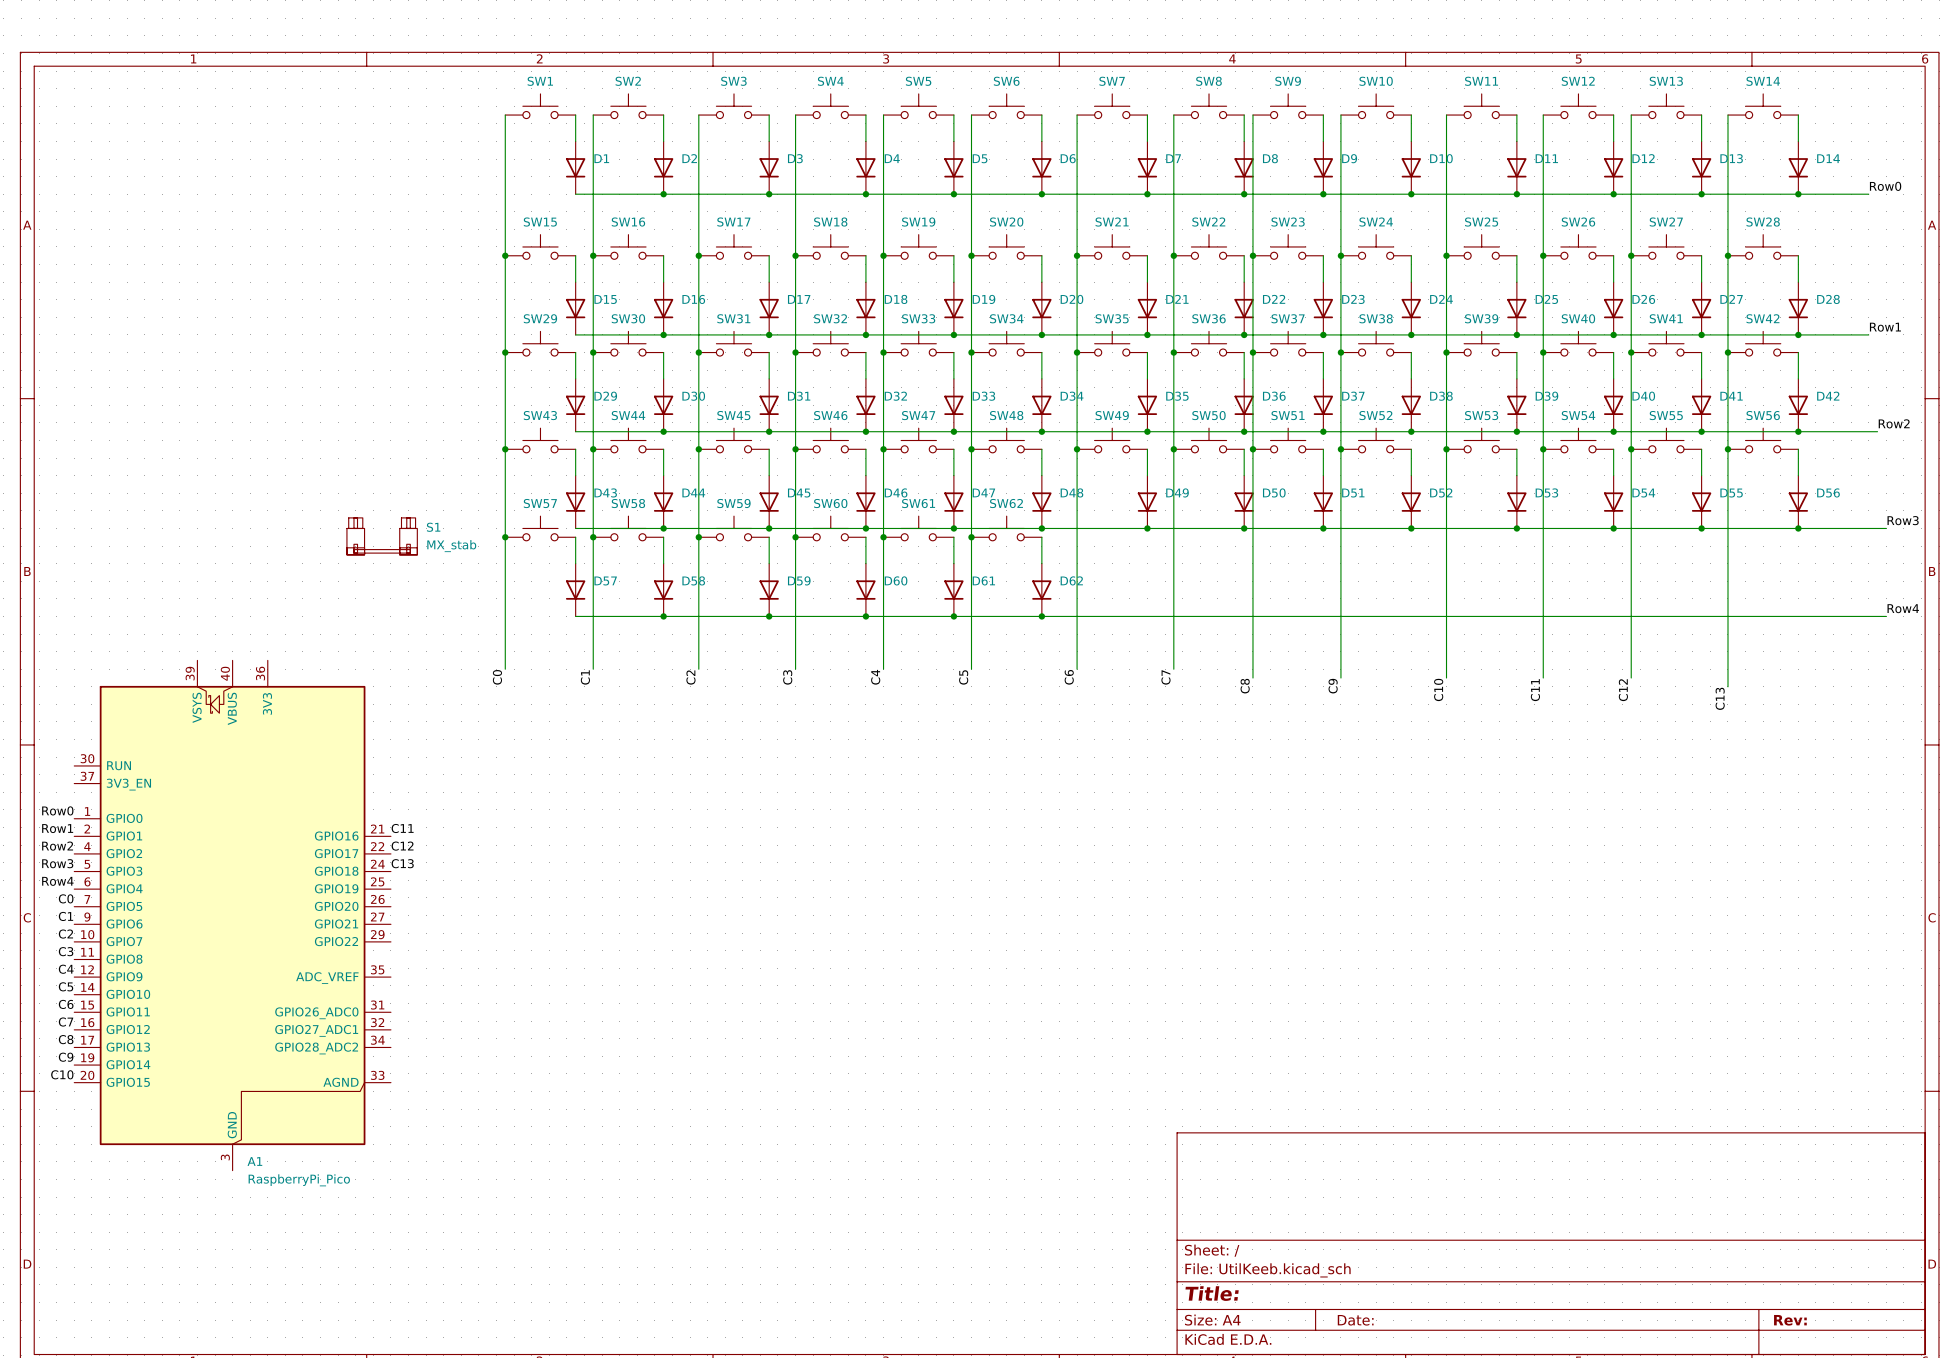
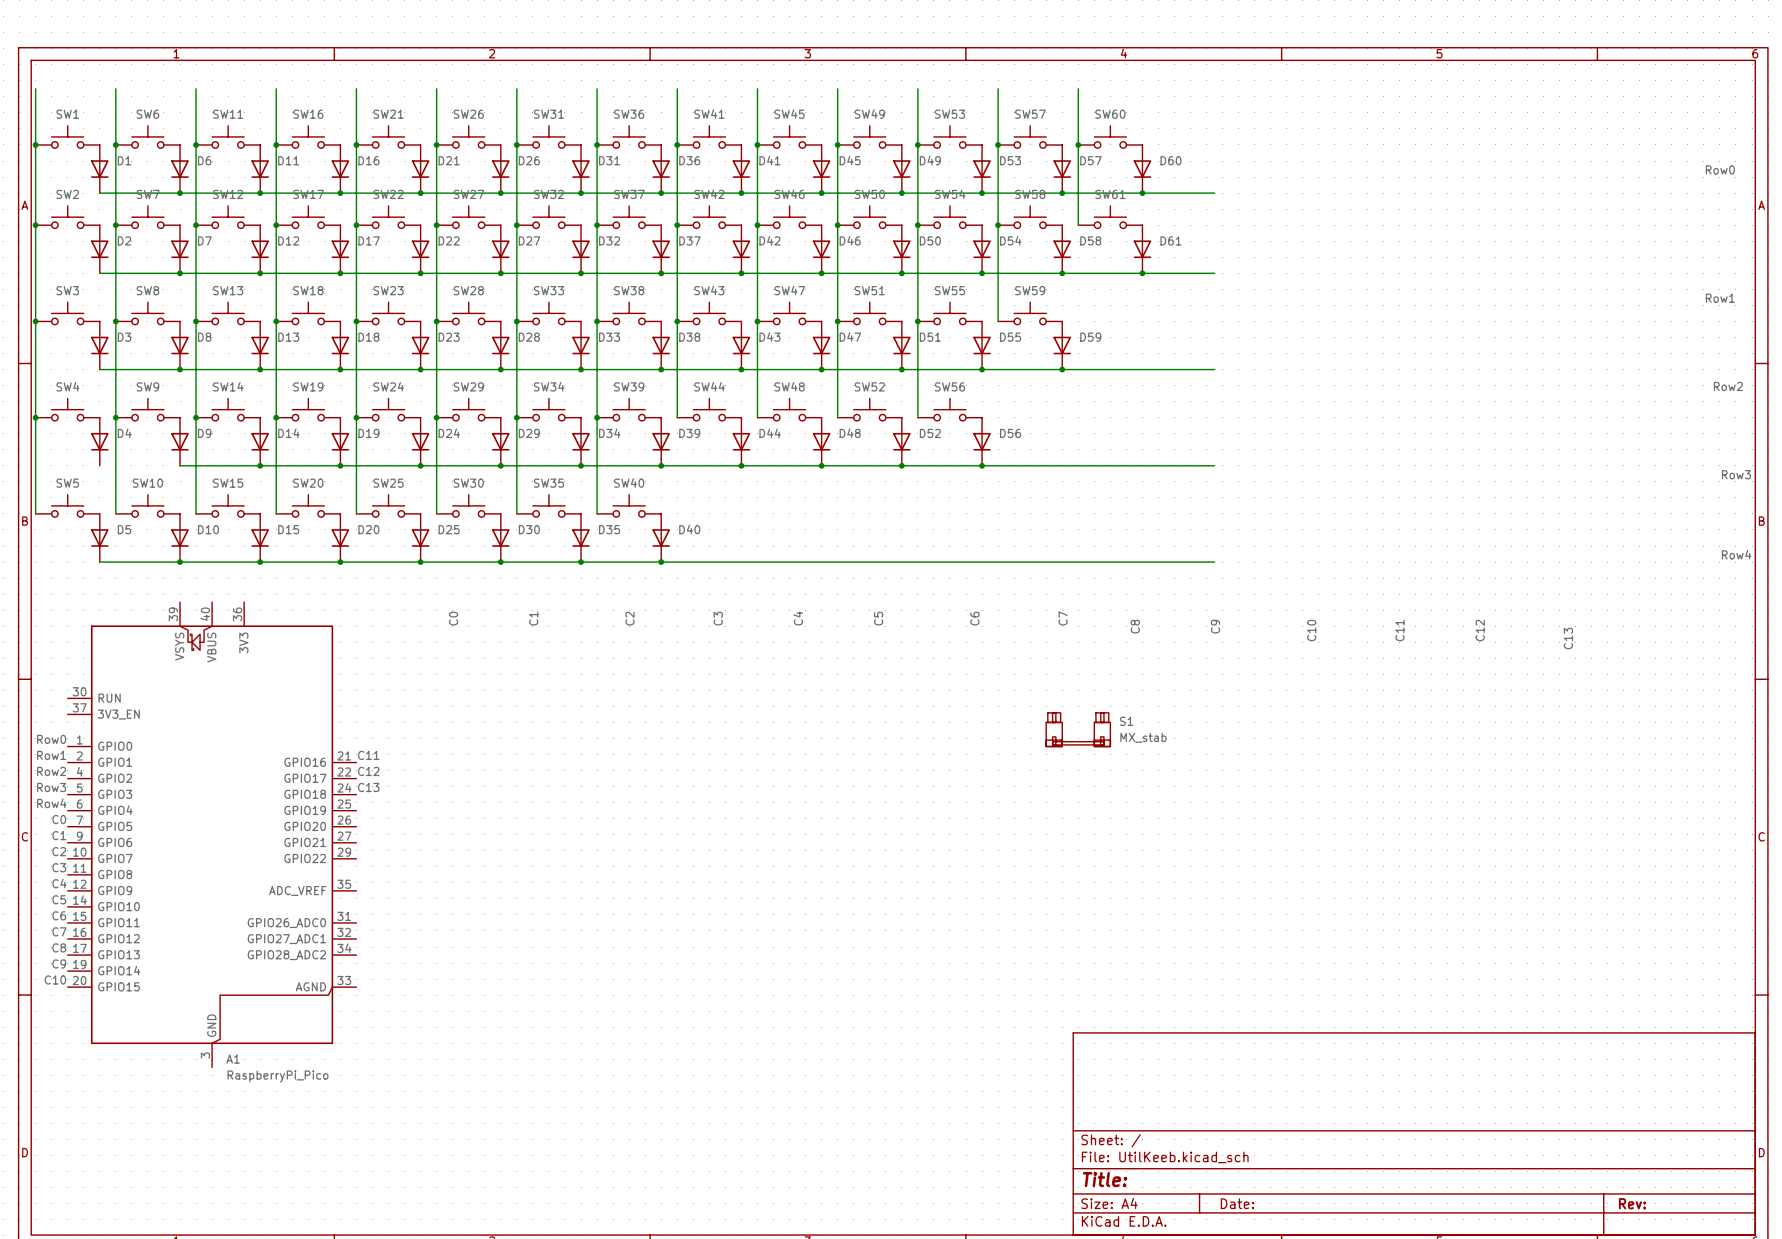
wire: none -> (35, 88) (35, 513)
wire: none -> (115, 88) (115, 513)
wire: none -> (196, 88) (196, 513)
wire: none -> (276, 88) (276, 513)
wire: none -> (356, 88) (356, 513)
wire: none -> (436, 88) (436, 513)
wire: none -> (516, 88) (516, 513)
wire: none -> (597, 88) (597, 513)
wire: none -> (677, 88) (677, 417)
wire: none -> (757, 88) (757, 417)
wire: none -> (837, 88) (837, 417)
wire: none -> (917, 88) (917, 417)
wire: none -> (998, 88) (998, 321)
wire: none -> (1078, 88) (1078, 225)
SW1 position: (540, 106) -> (67, 136)
SW2 position: (628, 106) -> (67, 217)
SW3 position: (733, 106) -> (67, 313)
SW4 position: (830, 106) -> (67, 409)
SW5 position: (918, 106) -> (67, 505)
SW6 position: (1006, 106) -> (147, 136)
SW7 position: (1112, 106) -> (147, 217)
SW8 position: (1209, 106) -> (147, 313)
SW9 position: (1288, 106) -> (147, 409)
SW10 position: (1376, 106) -> (147, 505)
SW11 position: (1481, 106) -> (228, 136)
SW12 position: (1578, 106) -> (228, 217)
SW13 position: (1666, 106) -> (228, 313)
SW14 position: (1763, 106) -> (228, 409)
wire: (505, 115) (505, 669) -> none
wire: (575, 115) (575, 141) -> none
wire: (593, 115) (593, 669) -> none
wire: (663, 115) (663, 141) -> none
wire: (698, 115) (698, 669) -> none
wire: (769, 115) (769, 141) -> none
wire: (795, 115) (795, 669) -> none
wire: (865, 115) (865, 141) -> none
wire: (883, 115) (883, 669) -> none
wire: (953, 115) (953, 141) -> none
wire: (971, 115) (971, 669) -> none
wire: (1041, 115) (1041, 141) -> none
wire: (1077, 115) (1077, 669) -> none
wire: (1147, 115) (1147, 141) -> none
wire: (1173, 115) (1173, 669) -> none
wire: (1244, 115) (1244, 141) -> none
wire: (1252, 115) (1252, 678) -> none
wire: (1323, 115) (1323, 141) -> none
wire: (1340, 115) (1340, 678) -> none
wire: (1411, 115) (1411, 141) -> none
wire: (1446, 115) (1446, 678) -> none
wire: (1516, 115) (1516, 141) -> none
wire: (1543, 115) (1543, 678) -> none
wire: (1613, 115) (1613, 141) -> none
wire: (1631, 115) (1631, 678) -> none
wire: (1701, 115) (1701, 141) -> none
wire: (1727, 115) (1727, 686) -> none
wire: (1798, 115) (1798, 141) -> none
junction: none -> (35, 144)
junction: none -> (115, 144)
junction: none -> (196, 144)
junction: none -> (276, 144)
junction: none -> (356, 144)
junction: none -> (436, 144)
junction: none -> (516, 144)
junction: none -> (597, 144)
junction: none -> (677, 144)
junction: none -> (757, 144)
junction: none -> (837, 144)
junction: none -> (917, 144)
junction: none -> (998, 144)
junction: none -> (1078, 144)
D1 position: (575, 167) -> (99, 169)
D2 position: (663, 167) -> (99, 249)
D3 position: (769, 167) -> (99, 345)
D4 position: (865, 167) -> (99, 441)
D5 position: (953, 167) -> (99, 537)
D6 position: (1041, 167) -> (180, 169)
D7 position: (1147, 167) -> (180, 249)
D8 position: (1244, 167) -> (180, 345)
D9 position: (1323, 167) -> (180, 441)
D10 position: (1411, 167) -> (180, 537)
D11 position: (1516, 167) -> (260, 169)
D12 position: (1613, 167) -> (260, 249)
D13 position: (1701, 167) -> (260, 345)
D14 position: (1798, 167) -> (260, 441)
wire: (575, 194) (1868, 194) -> none
junction: (663, 194) -> none
junction: (769, 194) -> none
junction: (865, 194) -> none
junction: (953, 194) -> none
junction: (1041, 194) -> none
junction: (1147, 194) -> none
junction position: (1244, 194) -> (1142, 193)
junction: (1323, 194) -> none
junction: (1411, 194) -> none
junction: (1516, 194) -> none
junction: (1613, 194) -> none
junction: (1701, 194) -> none
junction: (1798, 194) -> none
wire: none -> (99, 193) (1214, 193)
junction: none -> (180, 193)
junction: none -> (260, 193)
junction: none -> (340, 193)
junction: none -> (420, 193)
junction: none -> (500, 193)
junction: none -> (581, 193)
junction: none -> (661, 193)
junction: none -> (741, 193)
junction: none -> (821, 193)
junction: none -> (901, 193)
junction: none -> (982, 193)
junction: none -> (1062, 193)
junction: none -> (35, 225)
junction: none -> (115, 225)
junction: none -> (196, 225)
junction: none -> (276, 225)
junction: none -> (356, 225)
SW15 position: (540, 246) -> (228, 505)
SW16 position: (628, 246) -> (308, 136)
junction: none -> (597, 225)
SW17 position: (733, 246) -> (308, 217)
junction: none -> (677, 225)
junction: none -> (757, 225)
SW18 position: (830, 246) -> (308, 313)
junction: none -> (837, 225)
SW19 position: (918, 246) -> (308, 409)
junction: none -> (917, 225)
SW20 position: (1006, 246) -> (308, 505)
SW21 position: (1112, 246) -> (388, 136)
SW22 position: (1209, 246) -> (388, 217)
SW23 position: (1288, 246) -> (388, 313)
SW24 position: (1376, 246) -> (388, 409)
SW25 position: (1481, 246) -> (388, 505)
SW26 position: (1578, 246) -> (468, 136)
SW27 position: (1666, 246) -> (468, 217)
SW28 position: (1763, 246) -> (468, 313)
junction position: (505, 255) -> (436, 225)
wire: (575, 255) (575, 282) -> none
junction position: (593, 255) -> (516, 225)
wire: (663, 255) (663, 282) -> none
junction: (698, 255) -> none
wire: (769, 255) (769, 282) -> none
junction: (795, 255) -> none
wire: (865, 255) (865, 282) -> none
junction: (883, 255) -> none
wire: (953, 255) (953, 282) -> none
junction: (971, 255) -> none
wire: (1041, 255) (1041, 282) -> none
junction position: (1077, 255) -> (998, 225)
wire: (1147, 255) (1147, 282) -> none
junction: (1173, 255) -> none
wire: (1244, 255) (1244, 282) -> none
junction: (1252, 255) -> none
wire: (1323, 255) (1323, 282) -> none
junction: (1340, 255) -> none
wire: (1411, 255) (1411, 282) -> none
junction: (1446, 255) -> none
wire: (1516, 255) (1516, 282) -> none
junction: (1543, 255) -> none
wire: (1613, 255) (1613, 282) -> none
junction: (1631, 255) -> none
wire: (1701, 255) (1701, 282) -> none
junction: (1727, 255) -> none
wire: (1798, 255) (1798, 282) -> none
wire: none -> (99, 273) (1214, 273)
junction: none -> (180, 273)
junction: none -> (260, 273)
junction: none -> (340, 273)
junction: none -> (420, 273)
junction: none -> (500, 273)
junction: none -> (581, 273)
junction: none -> (661, 273)
junction: none -> (741, 273)
junction: none -> (821, 273)
junction: none -> (901, 273)
junction: none -> (982, 273)
junction: none -> (1062, 273)
junction: none -> (1142, 273)
D15 position: (575, 308) -> (260, 537)
D16 position: (663, 308) -> (340, 169)
D17 position: (769, 308) -> (340, 249)
D18 position: (865, 308) -> (340, 345)
D19 position: (953, 308) -> (340, 441)
D20 position: (1041, 308) -> (340, 537)
D21 position: (1147, 308) -> (420, 169)
D22 position: (1244, 308) -> (420, 249)
D23 position: (1323, 308) -> (420, 345)
D24 position: (1411, 308) -> (420, 441)
D25 position: (1516, 308) -> (420, 537)
D26 position: (1613, 308) -> (500, 169)
D27 position: (1701, 308) -> (500, 249)
D28 position: (1798, 308) -> (500, 345)
wire: (575, 334) (1868, 334) -> none
junction position: (663, 334) -> (597, 321)
junction: (769, 334) -> none
junction: (865, 334) -> none
junction: (953, 334) -> none
junction: (1041, 334) -> none
junction: (1147, 334) -> none
junction: (1244, 334) -> none
junction: (1323, 334) -> none
junction: (1411, 334) -> none
junction: (1516, 334) -> none
junction: (1613, 334) -> none
junction: (1701, 334) -> none
junction: (1798, 334) -> none
SW29 position: (540, 343) -> (468, 409)
SW30 position: (628, 343) -> (468, 505)
SW31 position: (733, 343) -> (548, 136)
SW32 position: (830, 343) -> (548, 217)
SW33 position: (918, 343) -> (548, 313)
SW34 position: (1006, 343) -> (548, 409)
SW35 position: (1112, 343) -> (548, 505)
SW36 position: (1209, 343) -> (629, 136)
SW37 position: (1288, 343) -> (629, 217)
SW38 position: (1376, 343) -> (629, 313)
SW39 position: (1481, 343) -> (629, 409)
SW40 position: (1578, 343) -> (629, 505)
SW41 position: (1666, 343) -> (709, 136)
SW42 position: (1763, 343) -> (709, 217)
junction: none -> (35, 321)
junction: none -> (115, 321)
junction: none -> (196, 321)
junction: none -> (276, 321)
junction: none -> (356, 321)
junction position: (505, 352) -> (436, 321)
wire: (575, 352) (575, 378) -> none
junction position: (593, 352) -> (516, 321)
wire: (663, 352) (663, 378) -> none
junction: (698, 352) -> none
junction: none -> (677, 321)
wire: (769, 352) (769, 378) -> none
junction: (795, 352) -> none
junction: none -> (757, 321)
wire: (865, 352) (865, 378) -> none
junction: (883, 352) -> none
junction: none -> (837, 321)
wire: (953, 352) (953, 378) -> none
junction: (971, 352) -> none
junction: none -> (917, 321)
wire: (1041, 352) (1041, 378) -> none
junction: (1077, 352) -> none
wire: (1147, 352) (1147, 378) -> none
junction: (1173, 352) -> none
wire: (1244, 352) (1244, 378) -> none
junction: (1252, 352) -> none
wire: (1323, 352) (1323, 378) -> none
junction: (1340, 352) -> none
wire: (1411, 352) (1411, 378) -> none
junction: (1446, 352) -> none
wire: (1516, 352) (1516, 378) -> none
junction: (1543, 352) -> none
wire: (1613, 352) (1613, 378) -> none
junction: (1631, 352) -> none
wire: (1701, 352) (1701, 378) -> none
junction: (1727, 352) -> none
wire: (1798, 352) (1798, 378) -> none
wire: none -> (99, 369) (1214, 369)
junction: none -> (180, 369)
junction: none -> (260, 369)
junction: none -> (340, 369)
junction: none -> (420, 369)
junction: none -> (500, 369)
D29 position: (575, 405) -> (500, 441)
junction: none -> (581, 369)
D30 position: (663, 405) -> (500, 537)
junction: none -> (661, 369)
D31 position: (769, 405) -> (581, 169)
junction: none -> (741, 369)
D32 position: (865, 405) -> (581, 249)
junction: none -> (821, 369)
D33 position: (953, 405) -> (581, 345)
junction: none -> (901, 369)
D34 position: (1041, 405) -> (581, 441)
junction: none -> (982, 369)
D35 position: (1147, 405) -> (581, 537)
junction: none -> (1062, 369)
D36 position: (1244, 405) -> (661, 169)
D37 position: (1323, 405) -> (661, 249)
D38 position: (1411, 405) -> (661, 345)
D39 position: (1516, 405) -> (661, 441)
D40 position: (1613, 405) -> (661, 537)
D41 position: (1701, 405) -> (741, 169)
D42 position: (1798, 405) -> (741, 249)
wire: (575, 431) (1877, 431) -> none
junction: (663, 431) -> none
junction: (769, 431) -> none
junction: (865, 431) -> none
junction: (953, 431) -> none
junction: (1041, 431) -> none
junction: (1147, 431) -> none
junction: (1244, 431) -> none
junction: (1323, 431) -> none
junction: (1411, 431) -> none
junction: (1516, 431) -> none
junction: (1613, 431) -> none
junction: (1701, 431) -> none
junction: (1798, 431) -> none
SW43 position: (540, 440) -> (709, 313)
SW44 position: (628, 440) -> (709, 409)
SW45 position: (733, 440) -> (789, 136)
SW46 position: (830, 440) -> (789, 217)
SW47 position: (918, 440) -> (789, 313)
SW48 position: (1006, 440) -> (789, 409)
SW49 position: (1112, 440) -> (869, 136)
SW50 position: (1209, 440) -> (869, 217)
SW51 position: (1288, 440) -> (869, 313)
SW52 position: (1376, 440) -> (869, 409)
SW53 position: (1481, 440) -> (949, 136)
SW54 position: (1578, 440) -> (949, 217)
SW55 position: (1666, 440) -> (949, 313)
SW56 position: (1763, 440) -> (949, 409)
junction position: (505, 449) -> (436, 417)
wire: (575, 449) (575, 475) -> none
junction position: (593, 449) -> (516, 417)
wire: (663, 449) (663, 475) -> none
junction: (698, 449) -> none
wire: (769, 449) (769, 475) -> none
junction: (795, 449) -> none
wire: (865, 449) (865, 475) -> none
junction: (883, 449) -> none
wire: (953, 449) (953, 475) -> none
junction: (971, 449) -> none
wire: (1041, 449) (1041, 475) -> none
junction: (1077, 449) -> none
wire: (1147, 449) (1147, 475) -> none
junction: (1173, 449) -> none
wire: (1244, 449) (1244, 475) -> none
junction: (1252, 449) -> none
wire: (1323, 449) (1323, 475) -> none
junction: (1340, 449) -> none
wire: (1411, 449) (1411, 475) -> none
junction: (1446, 449) -> none
wire: (1516, 449) (1516, 475) -> none
junction: (1543, 449) -> none
wire: (1613, 449) (1613, 475) -> none
junction: (1631, 449) -> none
wire: (1701, 449) (1701, 475) -> none
junction: (1727, 449) -> none
wire: (1798, 449) (1798, 475) -> none
junction: none -> (35, 417)
junction: none -> (115, 417)
junction: none -> (196, 417)
junction: none -> (276, 417)
junction: none -> (356, 417)
junction: none -> (597, 417)
D43 position: (575, 502) -> (741, 345)
D44 position: (663, 502) -> (741, 441)
D45 position: (769, 502) -> (821, 169)
D46 position: (865, 502) -> (821, 249)
D47 position: (953, 502) -> (821, 345)
D48 position: (1041, 502) -> (821, 441)
D49 position: (1147, 502) -> (901, 169)
D50 position: (1244, 502) -> (901, 249)
D51 position: (1323, 502) -> (901, 345)
D52 position: (1411, 502) -> (901, 441)
D53 position: (1516, 502) -> (982, 169)
D54 position: (1613, 502) -> (982, 249)
D55 position: (1701, 502) -> (982, 345)
D56 position: (1798, 502) -> (982, 441)
wire: none -> (180, 465) (1214, 465)
junction: none -> (260, 465)
junction: none -> (340, 465)
junction: none -> (420, 465)
junction: none -> (500, 465)
junction: none -> (581, 465)
junction: none -> (661, 465)
junction: none -> (741, 465)
junction: none -> (821, 465)
junction: none -> (901, 465)
junction: none -> (982, 465)
SW57 position: (540, 528) -> (1030, 136)
wire: (575, 528) (1886, 528) -> none
SW58 position: (628, 528) -> (1030, 217)
junction: (663, 528) -> none
SW59 position: (733, 528) -> (1030, 313)
junction: (769, 528) -> none
SW60 position: (830, 528) -> (1110, 136)
junction: (865, 528) -> none
SW61 position: (918, 528) -> (1110, 217)
junction: (953, 528) -> none
SW62: (1006, 528) -> none
junction: (1041, 528) -> none
junction: (1147, 528) -> none
junction: (1244, 528) -> none
junction: (1323, 528) -> none
junction: (1411, 528) -> none
junction: (1516, 528) -> none
junction: (1613, 528) -> none
junction: (1701, 528) -> none
junction: (1798, 528) -> none
S1 position: (382, 536) -> (1078, 729)
junction: (505, 537) -> none
wire: (575, 537) (575, 563) -> none
junction: (593, 537) -> none
wire: (663, 537) (663, 563) -> none
junction: (698, 537) -> none
wire: (769, 537) (769, 563) -> none
junction: (795, 537) -> none
wire: (865, 537) (865, 563) -> none
junction: (883, 537) -> none
wire: (953, 537) (953, 563) -> none
junction: (971, 537) -> none
wire: (1041, 537) (1041, 563) -> none
D57 position: (575, 590) -> (1062, 169)
D58 position: (663, 590) -> (1062, 249)
D59 position: (769, 590) -> (1062, 345)
D60 position: (865, 590) -> (1142, 169)
D61 position: (953, 590) -> (1142, 249)
D62: (1041, 590) -> none
wire: none -> (99, 562) (524, 562)
junction: none -> (180, 562)
junction: none -> (260, 562)
junction: none -> (340, 562)
junction: none -> (420, 562)
junction: none -> (500, 562)
junction position: (663, 616) -> (581, 562)
junction: none -> (661, 562)
junction: (769, 616) -> none
junction: (865, 616) -> none
junction: (953, 616) -> none
junction: (1041, 616) -> none
wire: (1332, 616) (1886, 616) -> none

